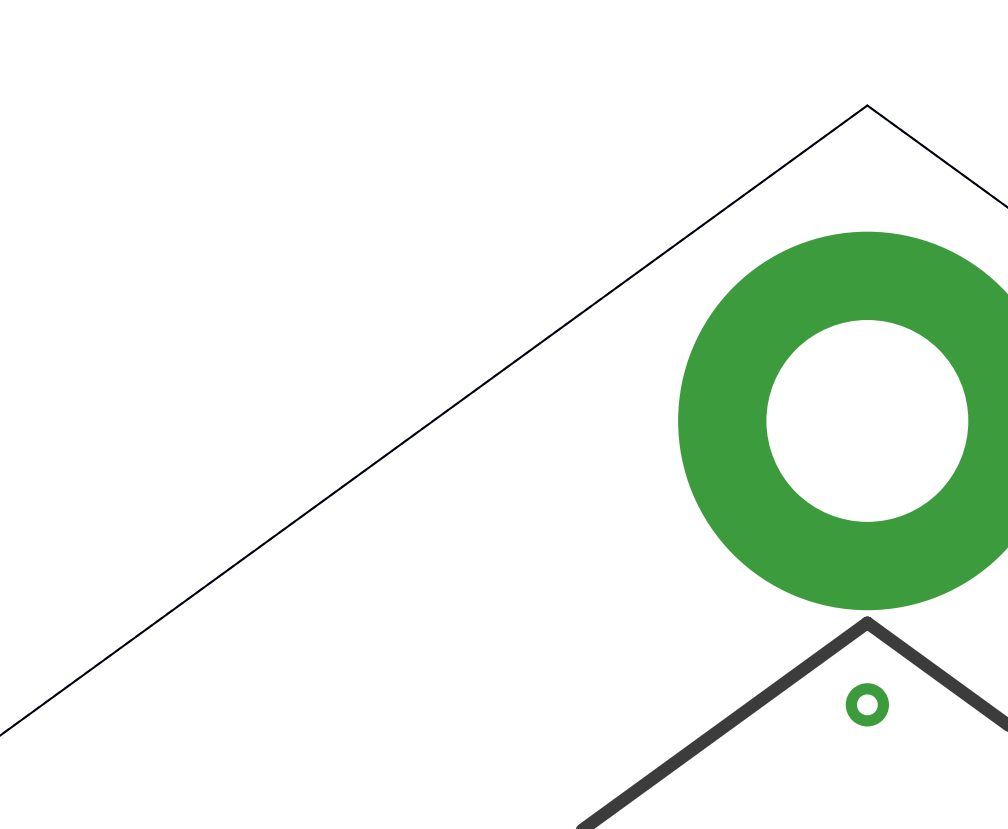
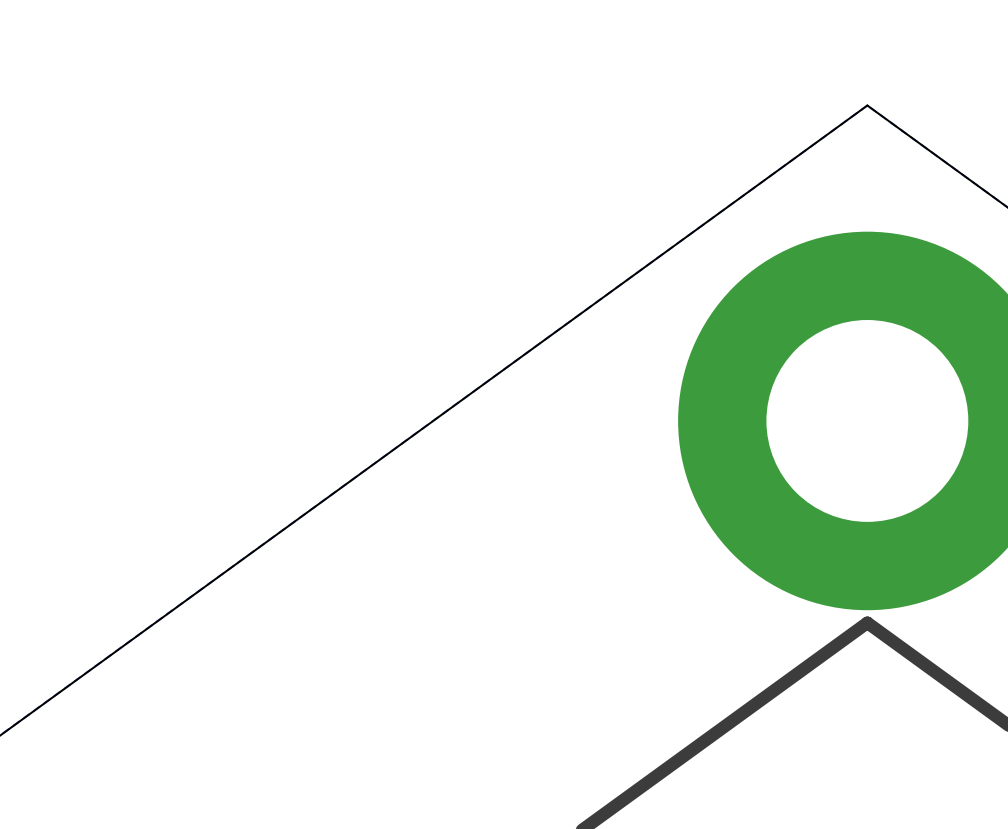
via: (867, 704) -> none

